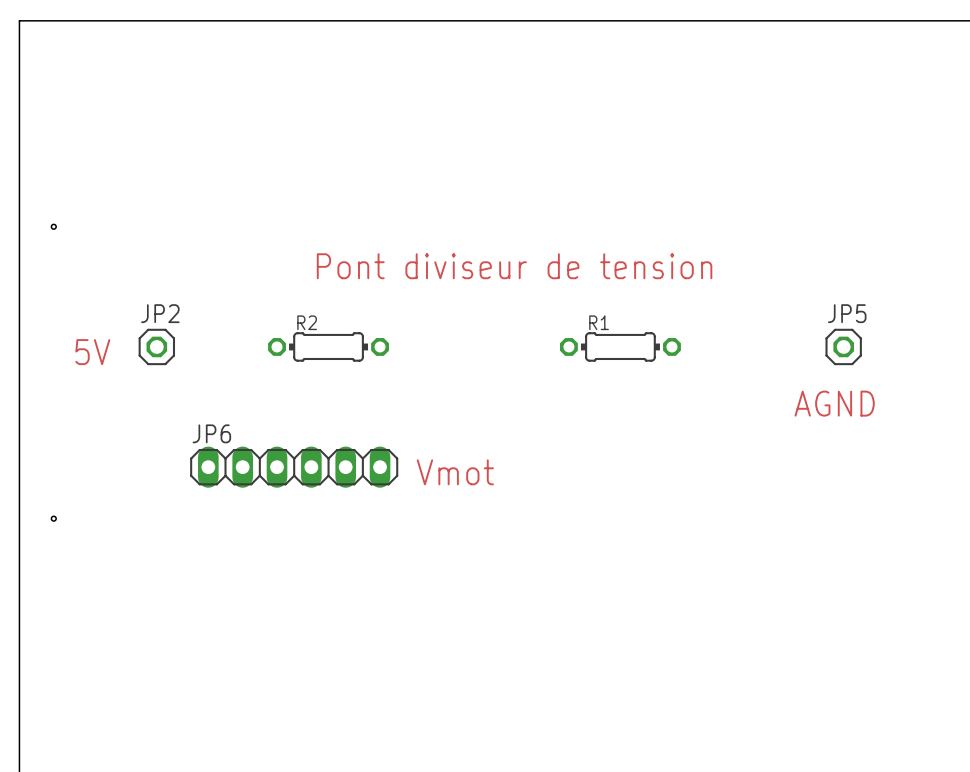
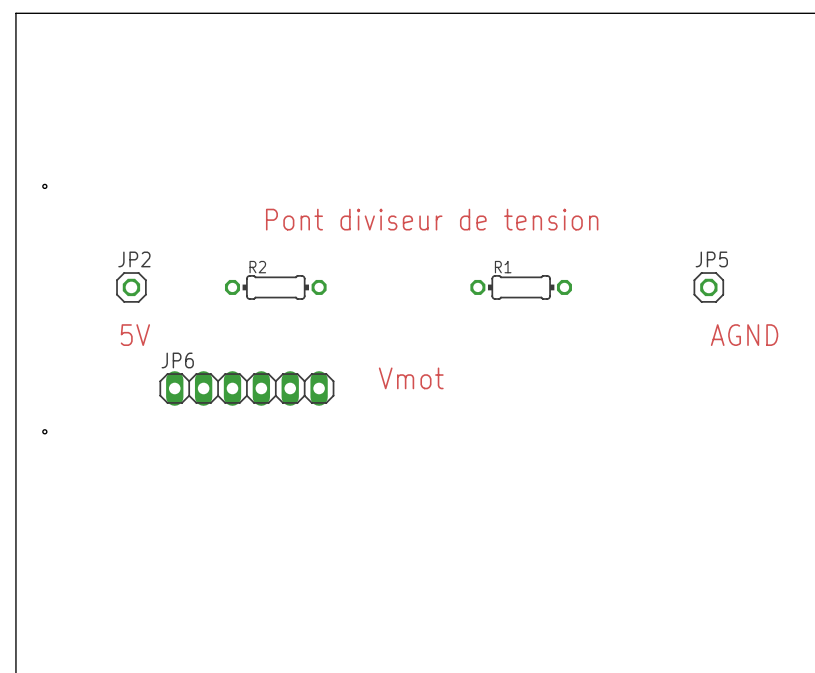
text position: 5V (92, 352) -> 5V (135, 335)
text position: AGND (834, 403) -> AGND (744, 335)
text position: Vmot (455, 472) -> Vmot (411, 378)

